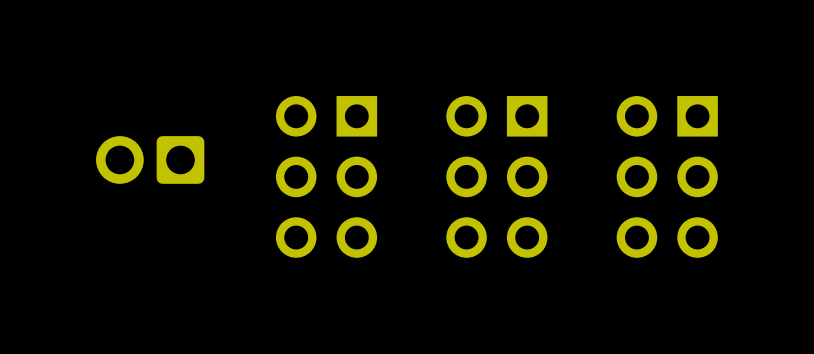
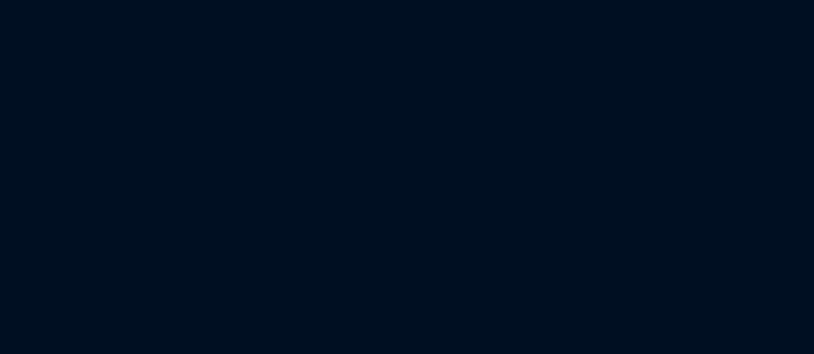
part: (150, 159) -> none
part: (326, 176) -> none
part: (496, 176) -> none
part: (667, 176) -> none

